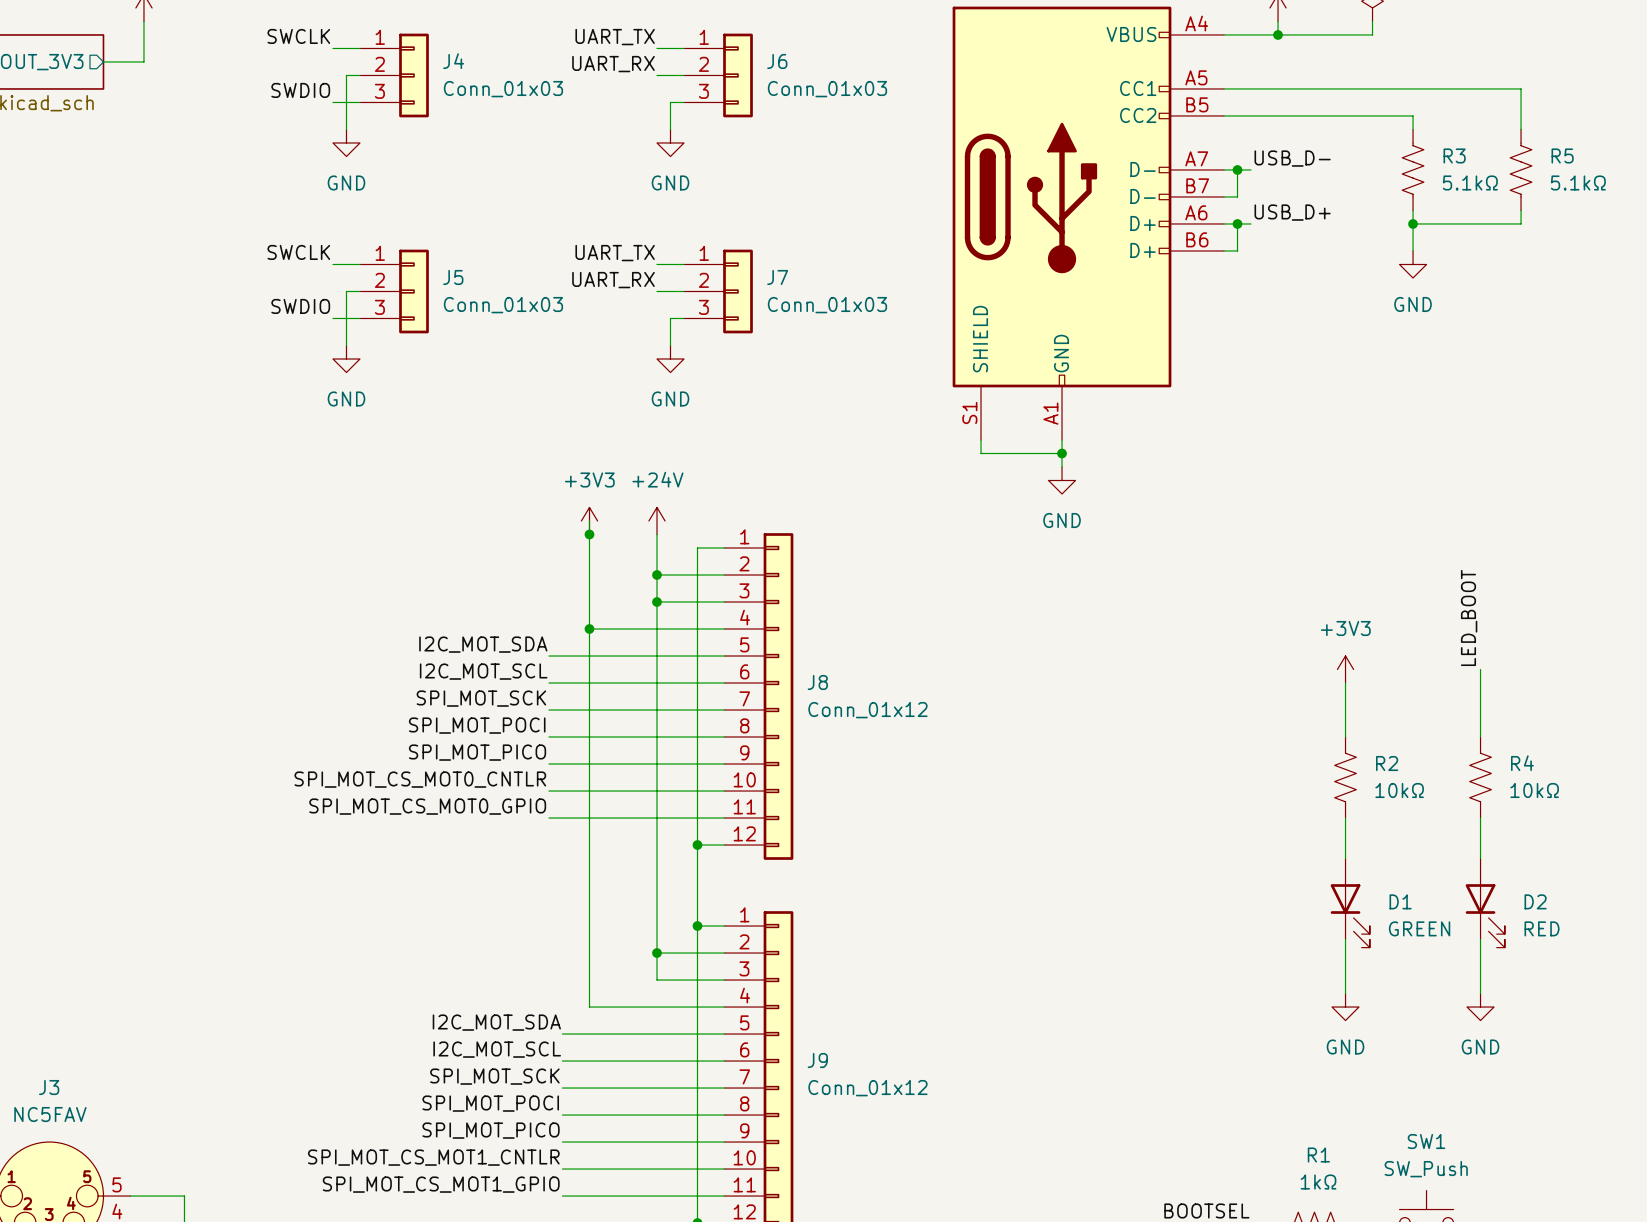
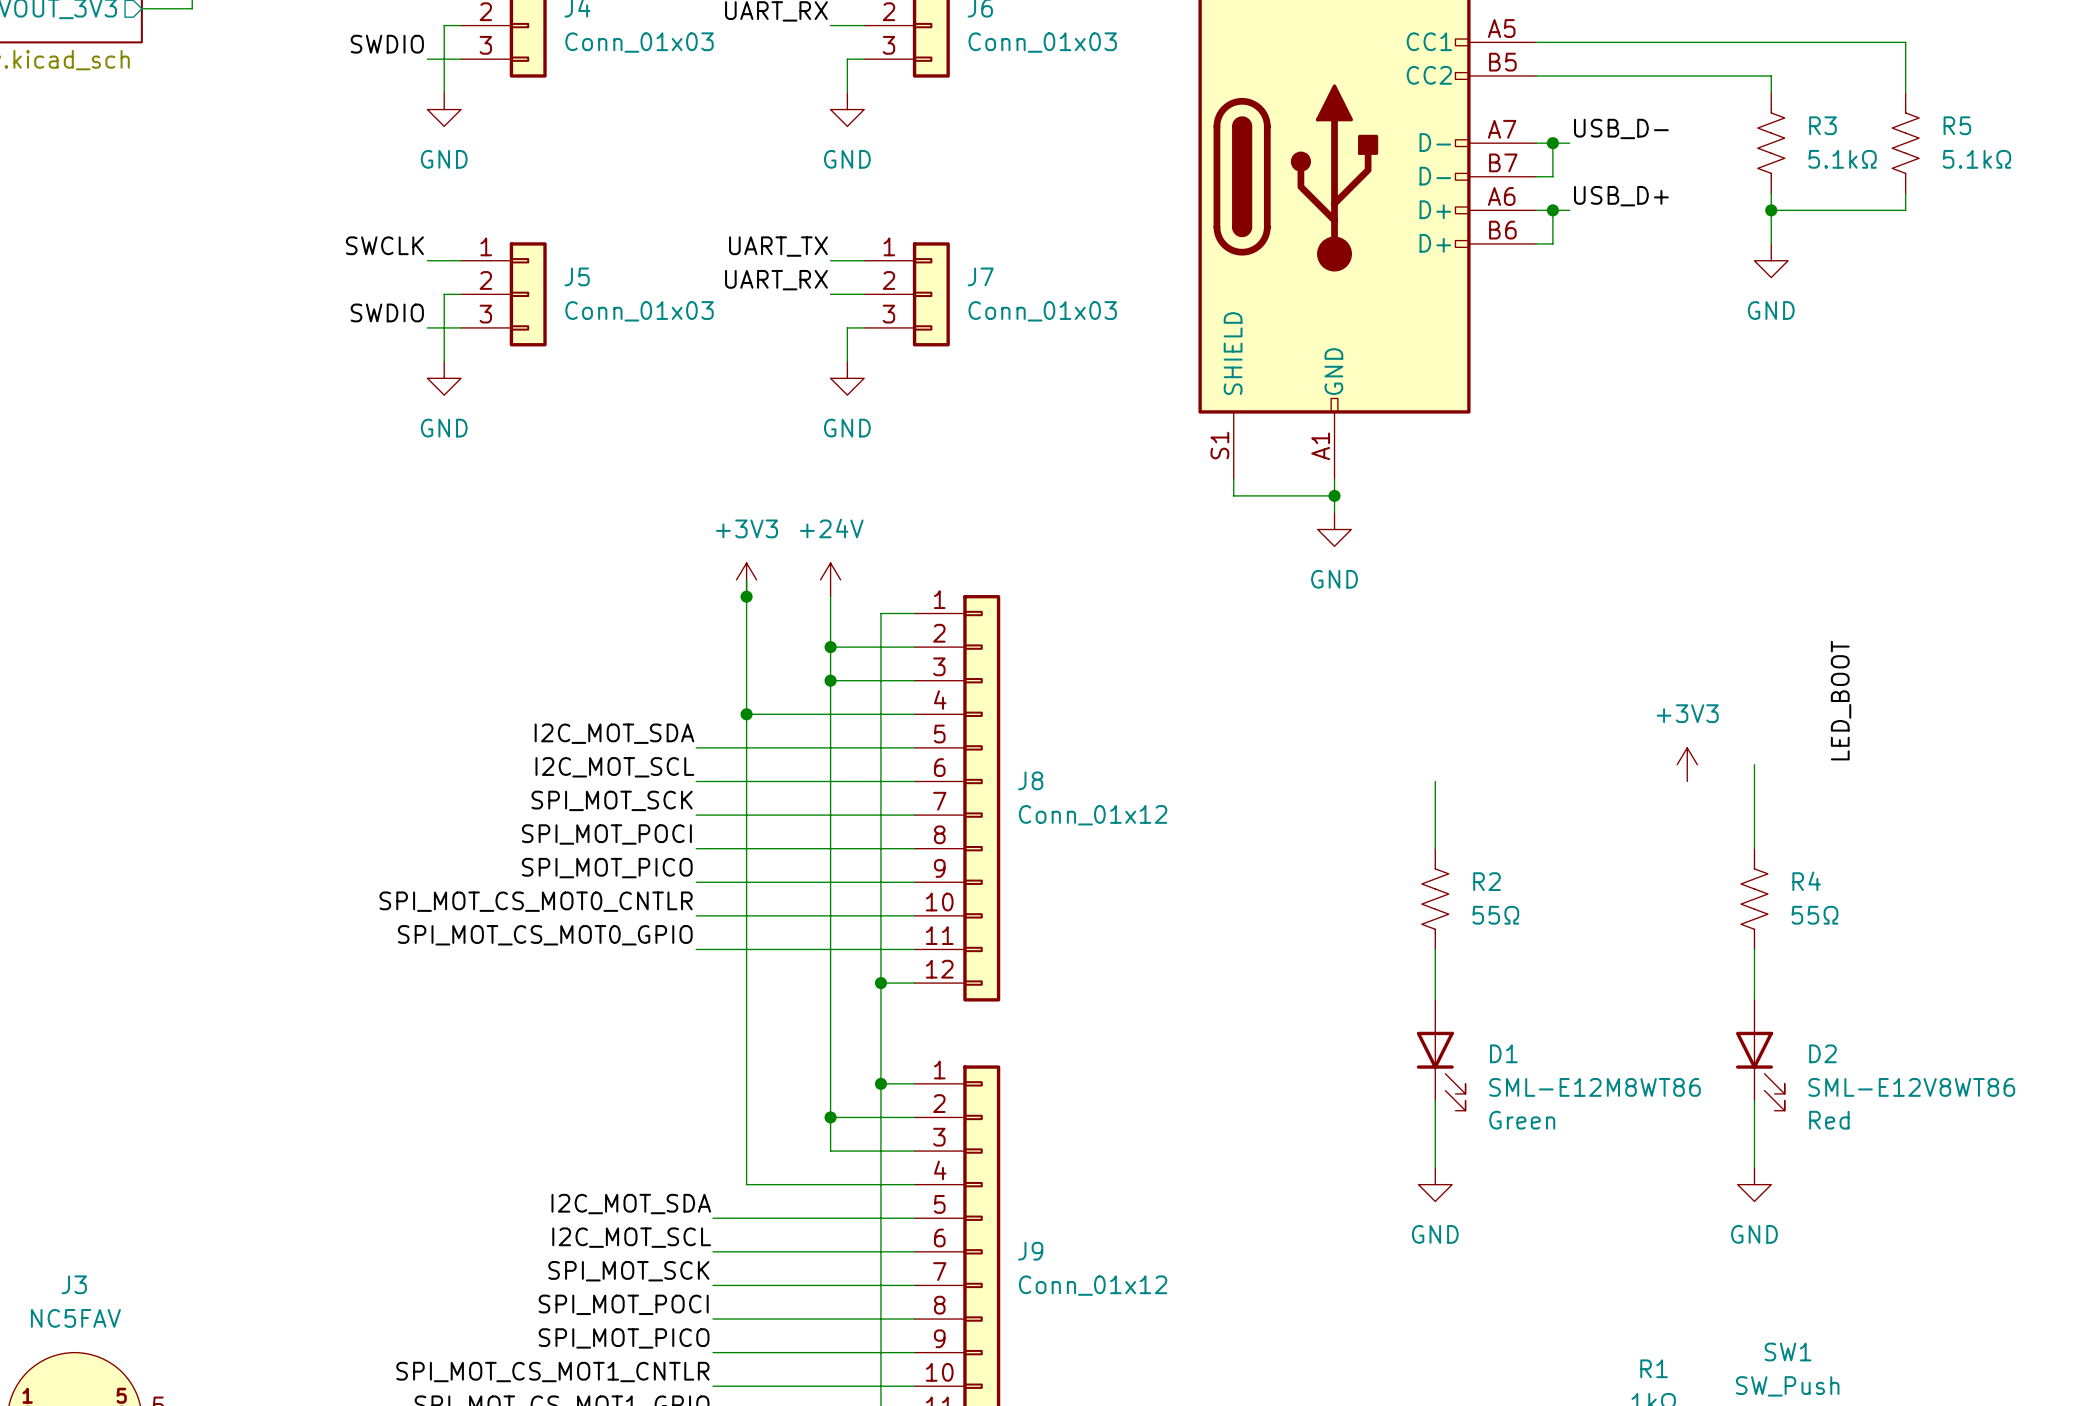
wire: (1480, 669) (1480, 737) -> (1754, 764) (1754, 848)
wire: (1345, 683) (1345, 737) -> (1435, 781) (1435, 848)
R2 position: (1345, 777) -> (1435, 899)
R4 position: (1480, 777) -> (1754, 899)
R2 value: 10kΩ (1399, 790) -> 55Ω (1495, 915)
R4 value: 10kΩ (1534, 790) -> 55Ω (1814, 915)
wire: (1345, 818) (1345, 858) -> (1435, 949) (1435, 999)
wire: (1480, 818) (1480, 858) -> (1754, 949) (1754, 999)
D1 position: (1350, 903) -> (1441, 1055)
D2 position: (1485, 903) -> (1760, 1055)
D1 value: GREEN (1419, 928) -> SML-E12M8WT86 (1595, 1087)
D2 value: RED (1542, 928) -> SML-E12V8WT86 (1911, 1087)
wire: (1345, 939) (1345, 993) -> (1435, 1100) (1435, 1167)
wire: (1480, 939) (1480, 993) -> (1754, 1100) (1754, 1167)
D1 text: none -> Green (1522, 1120)
D2 text: none -> Red (1829, 1120)
power symbol: none -> GND (1435, 1184)
power symbol: GND (1345, 1007) -> none
power symbol: none -> GND (1754, 1184)
power symbol: GND (1480, 1007) -> none

